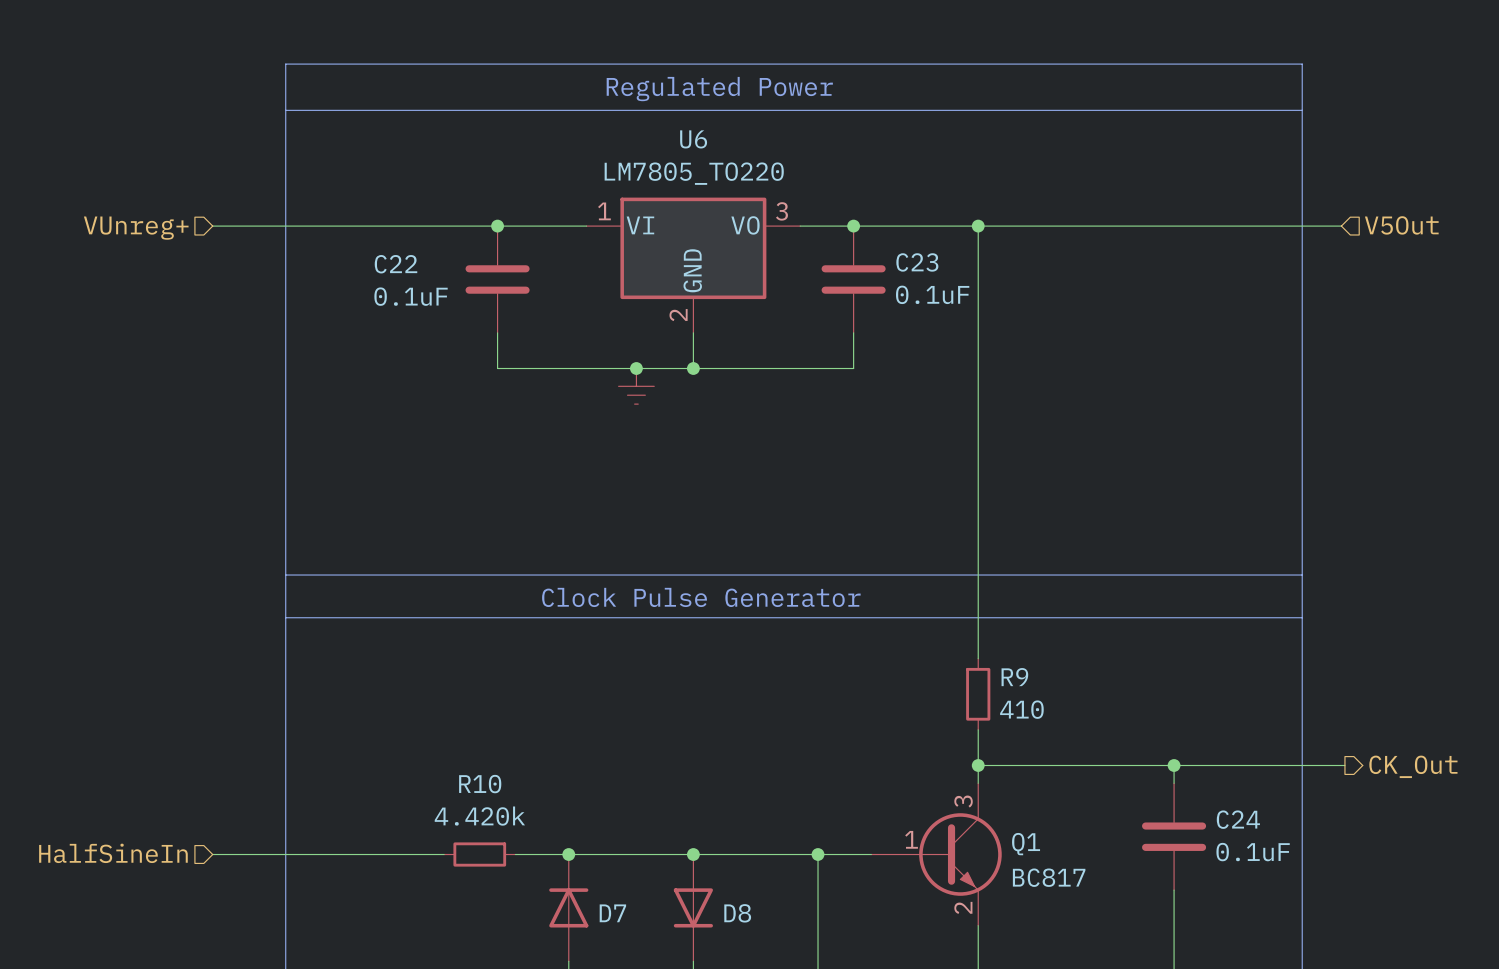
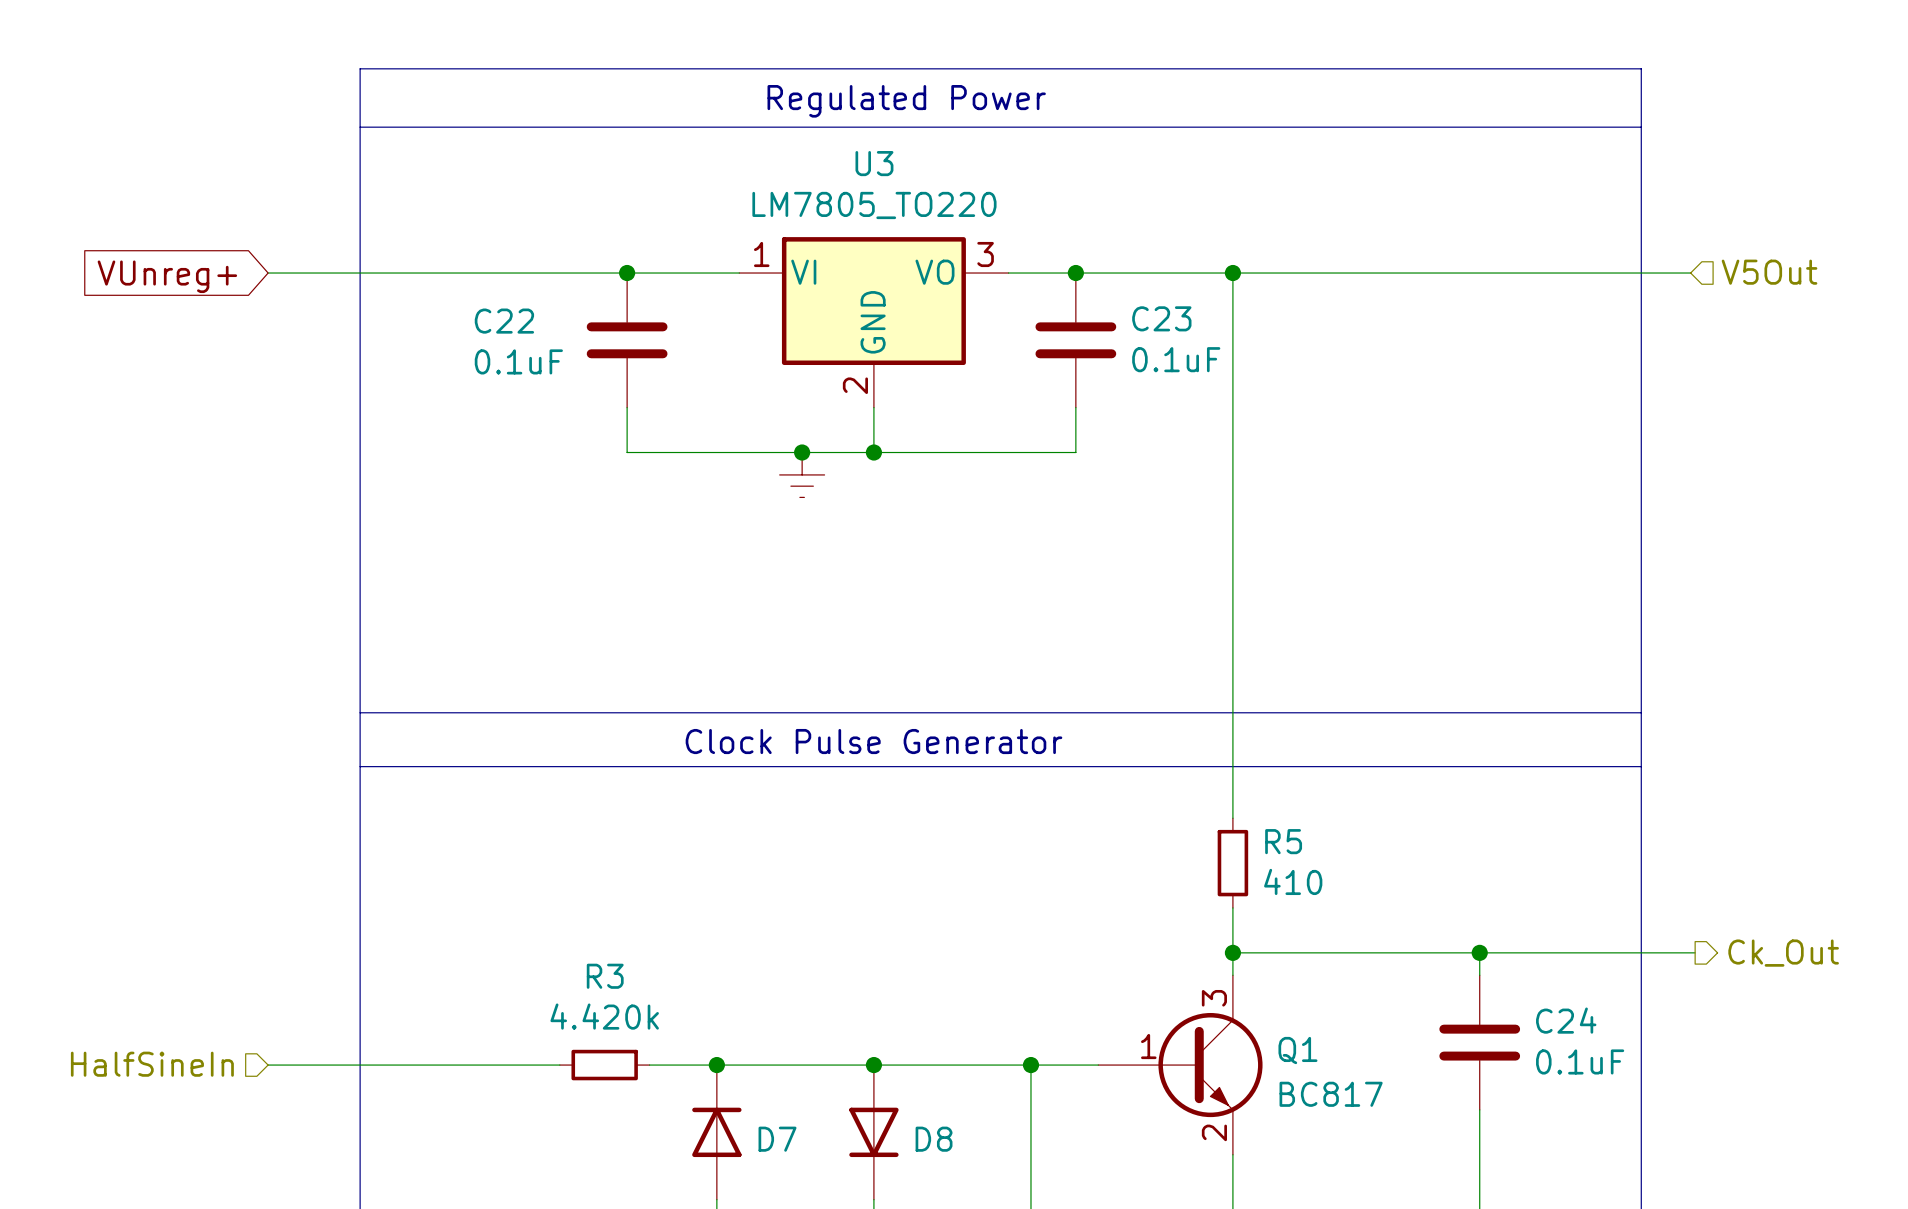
U6 name: U6 (693, 139) -> U3 (874, 163)
hierarchical label: VUnreg+ (136, 228) -> none
global label: none -> VUnreg+ (167, 276)
R9 name: R9 (1014, 677) -> R5 (1283, 841)
hierarchical label: CK_Out (1413, 766) -> Ck_Out (1783, 953)
R10 name: R10 (480, 784) -> R3 (605, 976)

